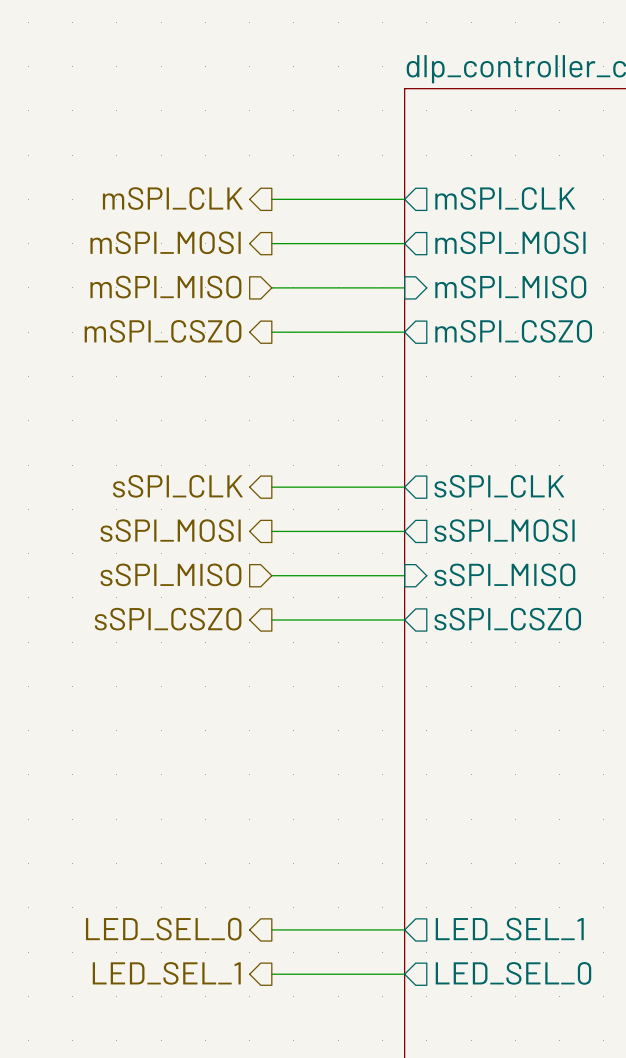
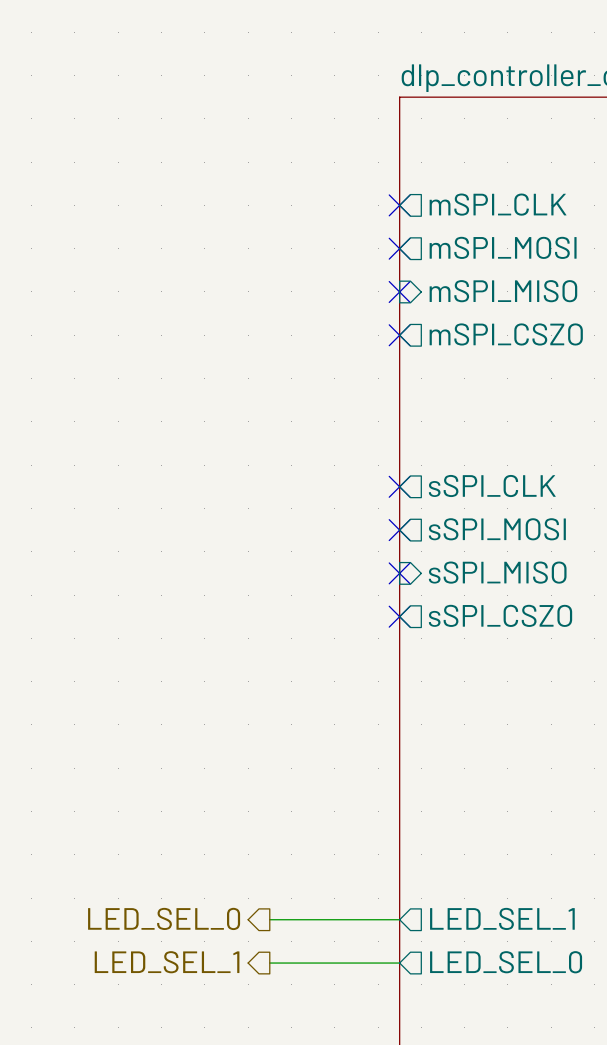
hierarchical label: mSPI_CLK (172, 198) -> none
wire: (271, 199) (404, 199) -> none
no-connect mark: none -> (399, 205)
hierarchical label: mSPI_MOSI (165, 242) -> none
wire: (271, 243) (404, 243) -> none
no-connect mark: none -> (399, 248)
hierarchical label: mSPI_MISO (165, 287) -> none
wire: (271, 287) (404, 287) -> none
no-connect mark: none -> (399, 291)
hierarchical label: mSPI_CSZO (163, 331) -> none
wire: (271, 332) (404, 332) -> none
no-connect mark: none -> (399, 335)
hierarchical label: sSPI_CLK (177, 486) -> none
wire: (271, 487) (404, 487) -> none
no-connect mark: none -> (399, 486)
hierarchical label: sSPI_MOSI (170, 530) -> none
wire: (271, 531) (404, 531) -> none
no-connect mark: none -> (399, 530)
hierarchical label: sSPI_MISO (171, 574) -> none
wire: (271, 575) (404, 575) -> none
no-connect mark: none -> (399, 573)
hierarchical label: sSPI_CSZO (168, 619) -> none
wire: (271, 619) (404, 619) -> none
no-connect mark: none -> (399, 616)

